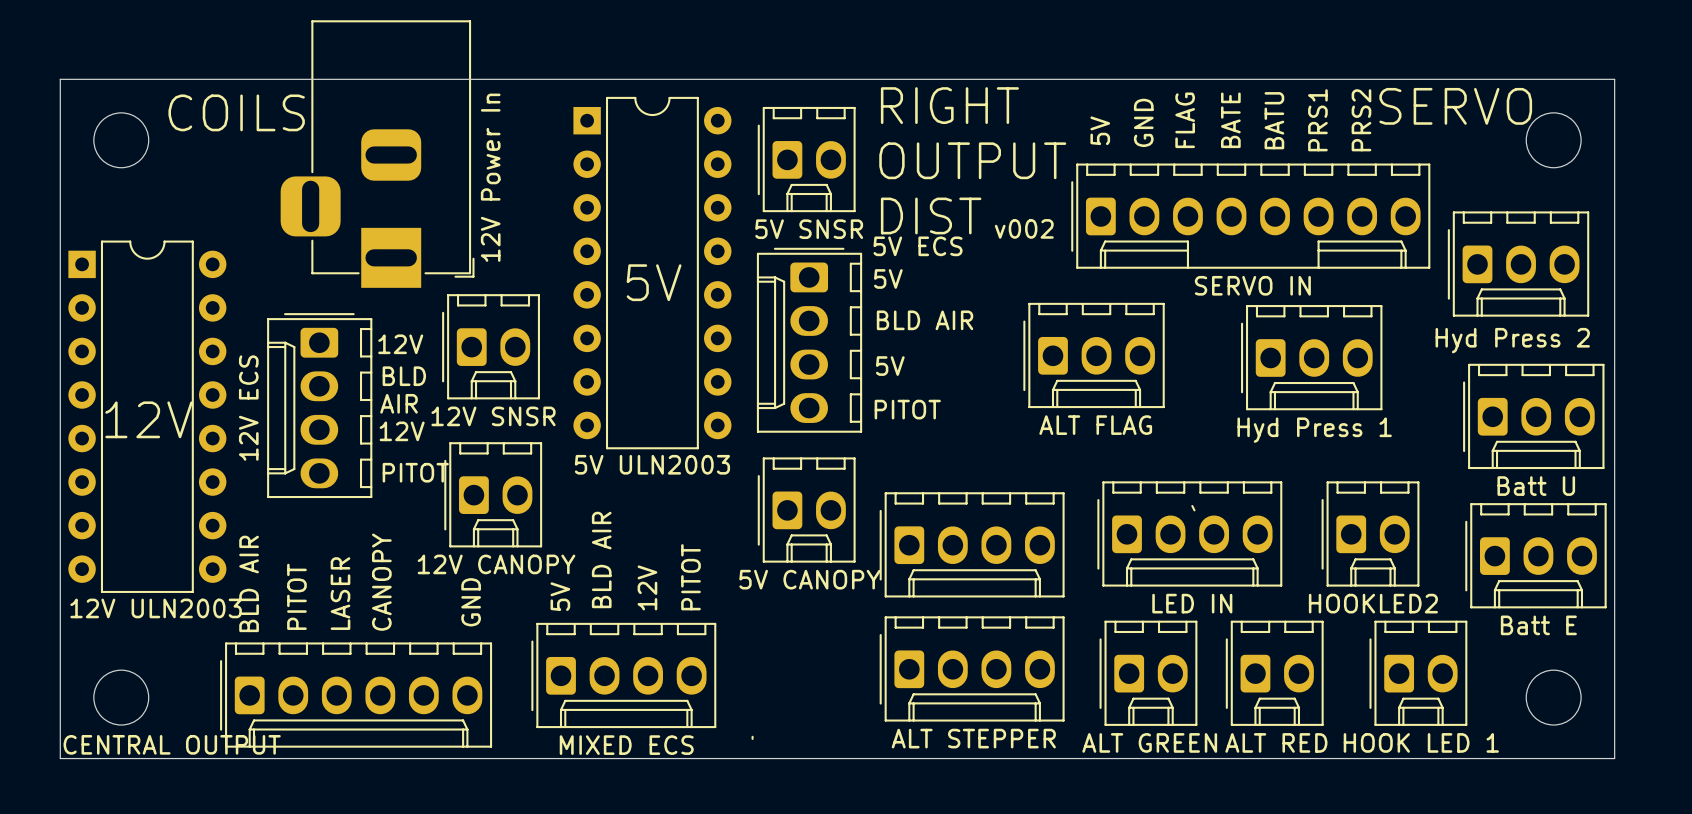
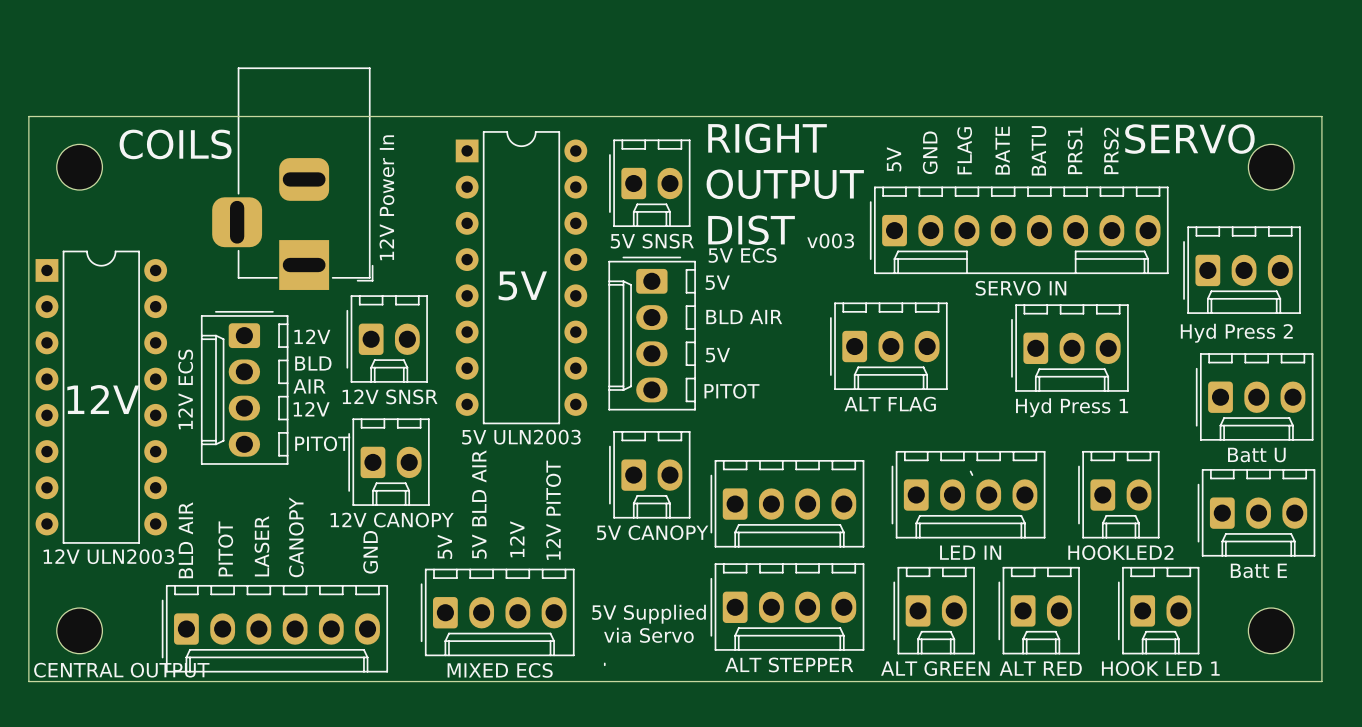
text: v002 (1024, 228) -> v003 (830, 240)
text: BLD AIR (601, 559) -> 5V BLD AIR (479, 504)
text: PITOT (690, 577) -> 12V PITOT (553, 510)
text: none -> 5V Supplied (649, 614)
text: none -> via Servo (648, 635)

